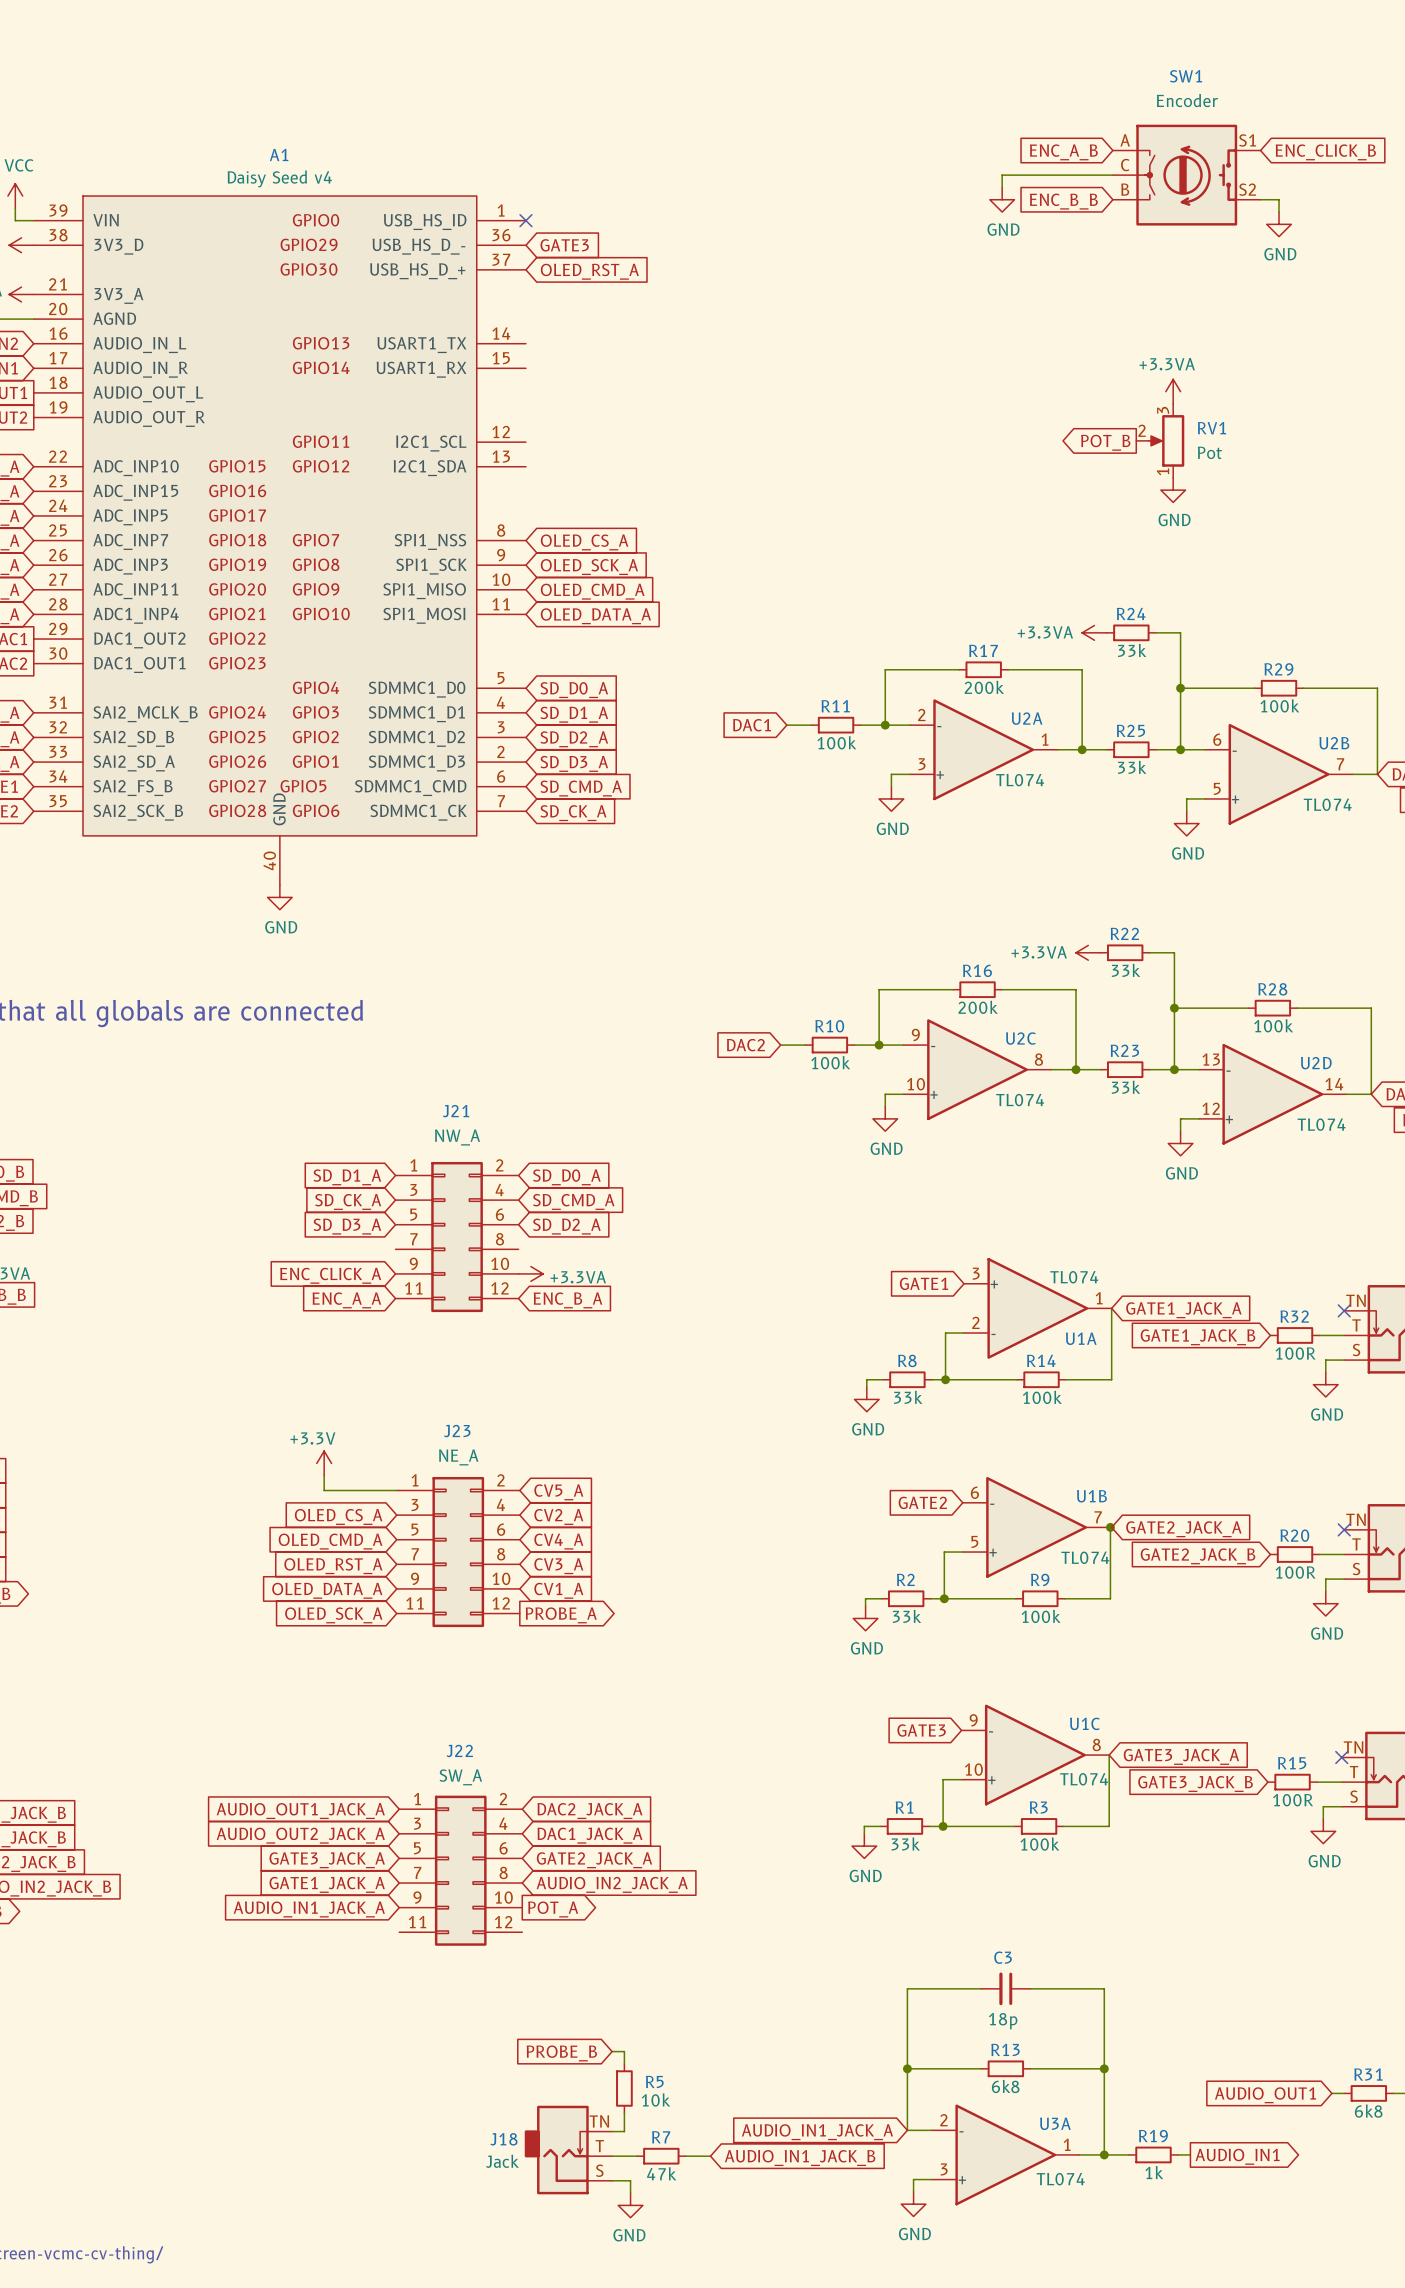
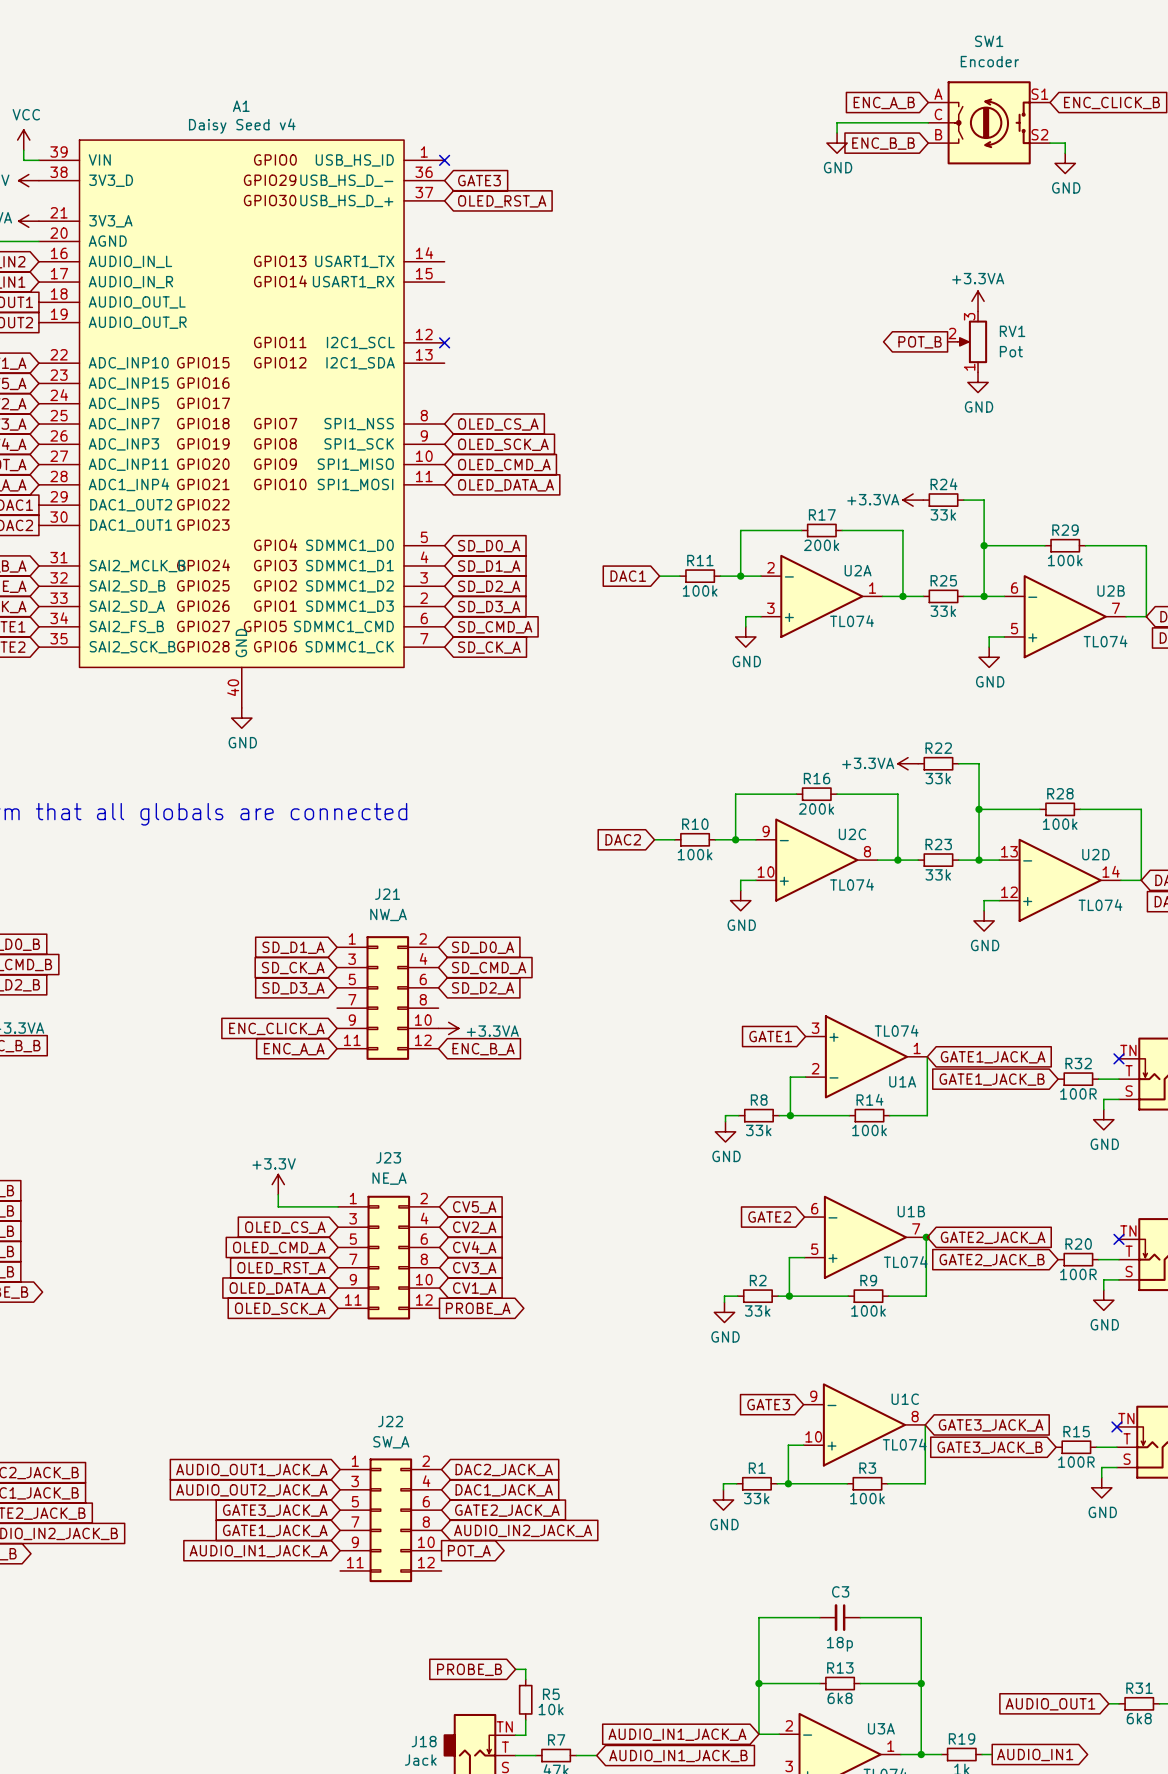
no-connect mark: none -> (444, 342)

